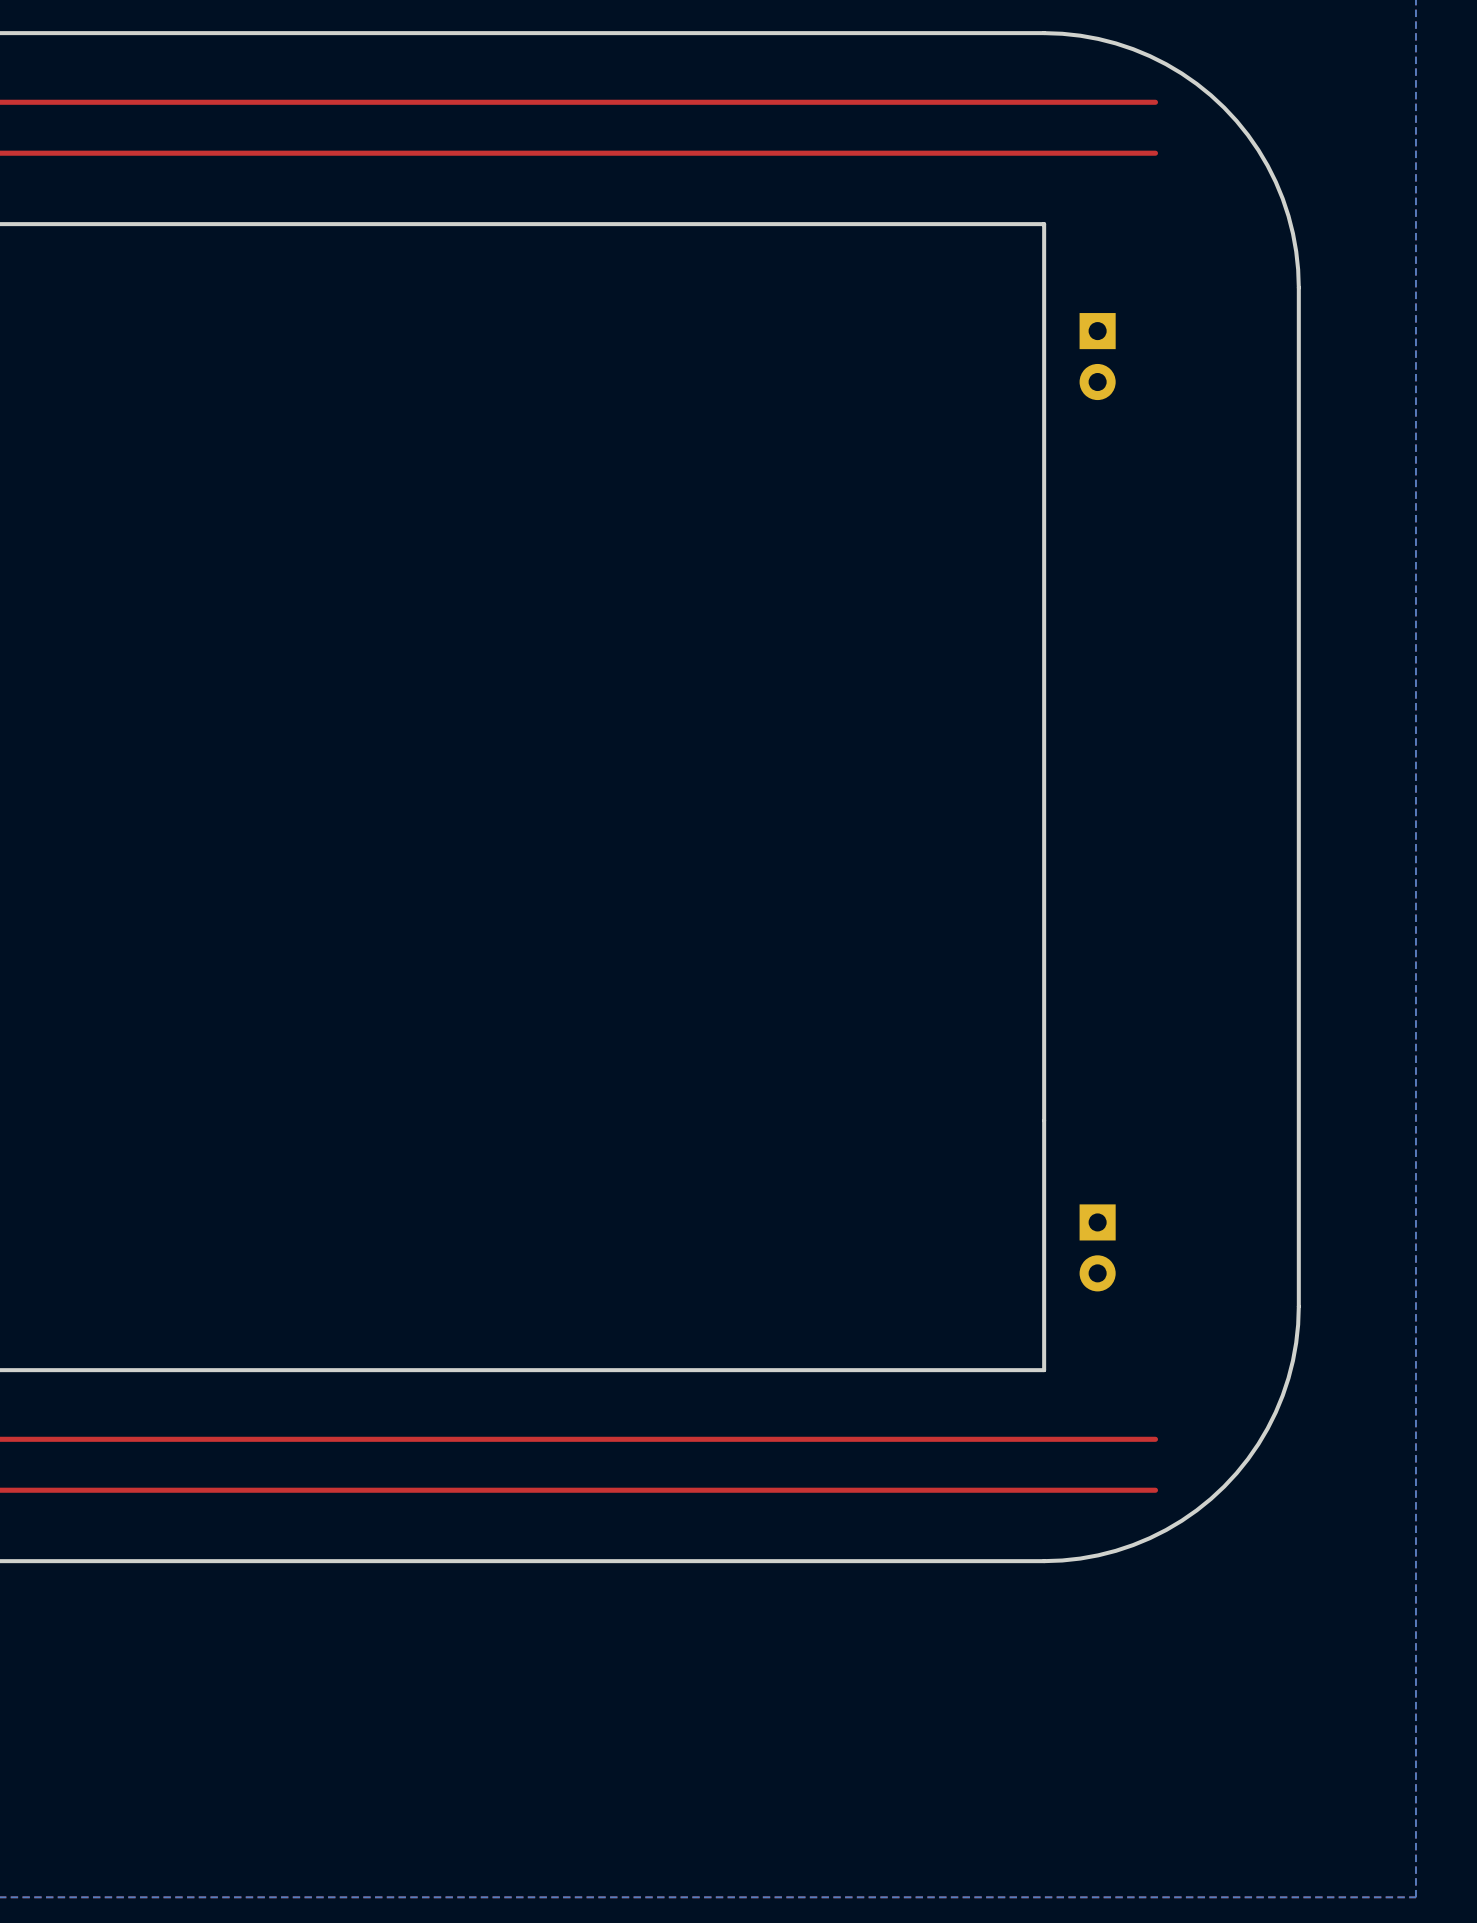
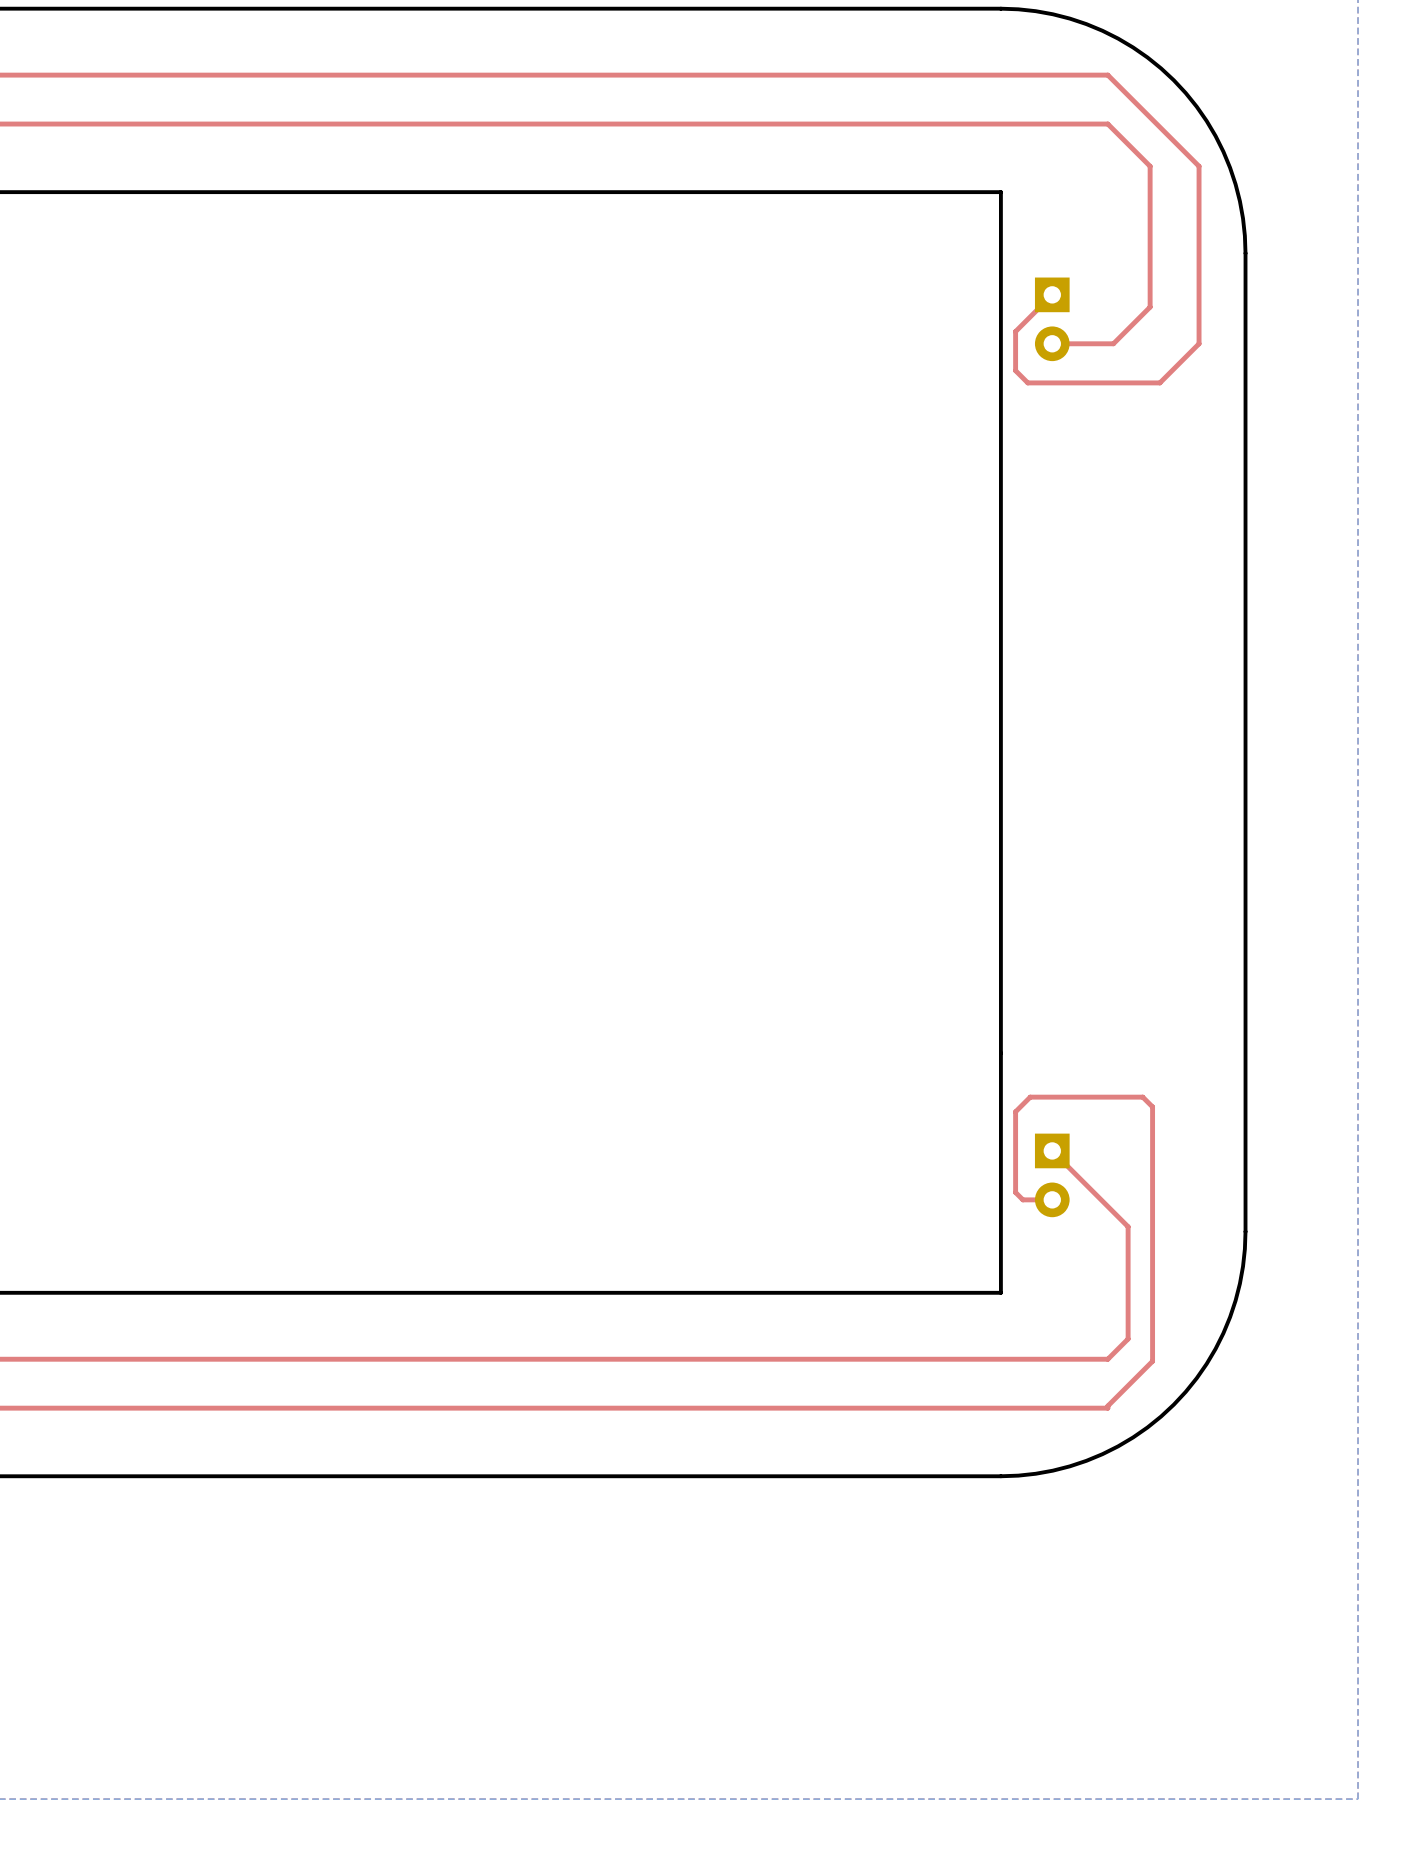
top track: none -> (1107, 75) (1199, 166) (1199, 343) (1159, 382) (1027, 382) (1015, 370) (1015, 331) (1052, 294)
top track: none -> (1107, 124) (1150, 166) (1150, 307) (1113, 343) (1052, 343)
top track: none -> (1052, 1150) (1128, 1226) (1128, 1338) (1107, 1359)
top track: none -> (1052, 1199) (1022, 1199) (1015, 1192) (1015, 1111) (1030, 1097) (1142, 1097) (1152, 1106) (1152, 1361) (1107, 1408)

